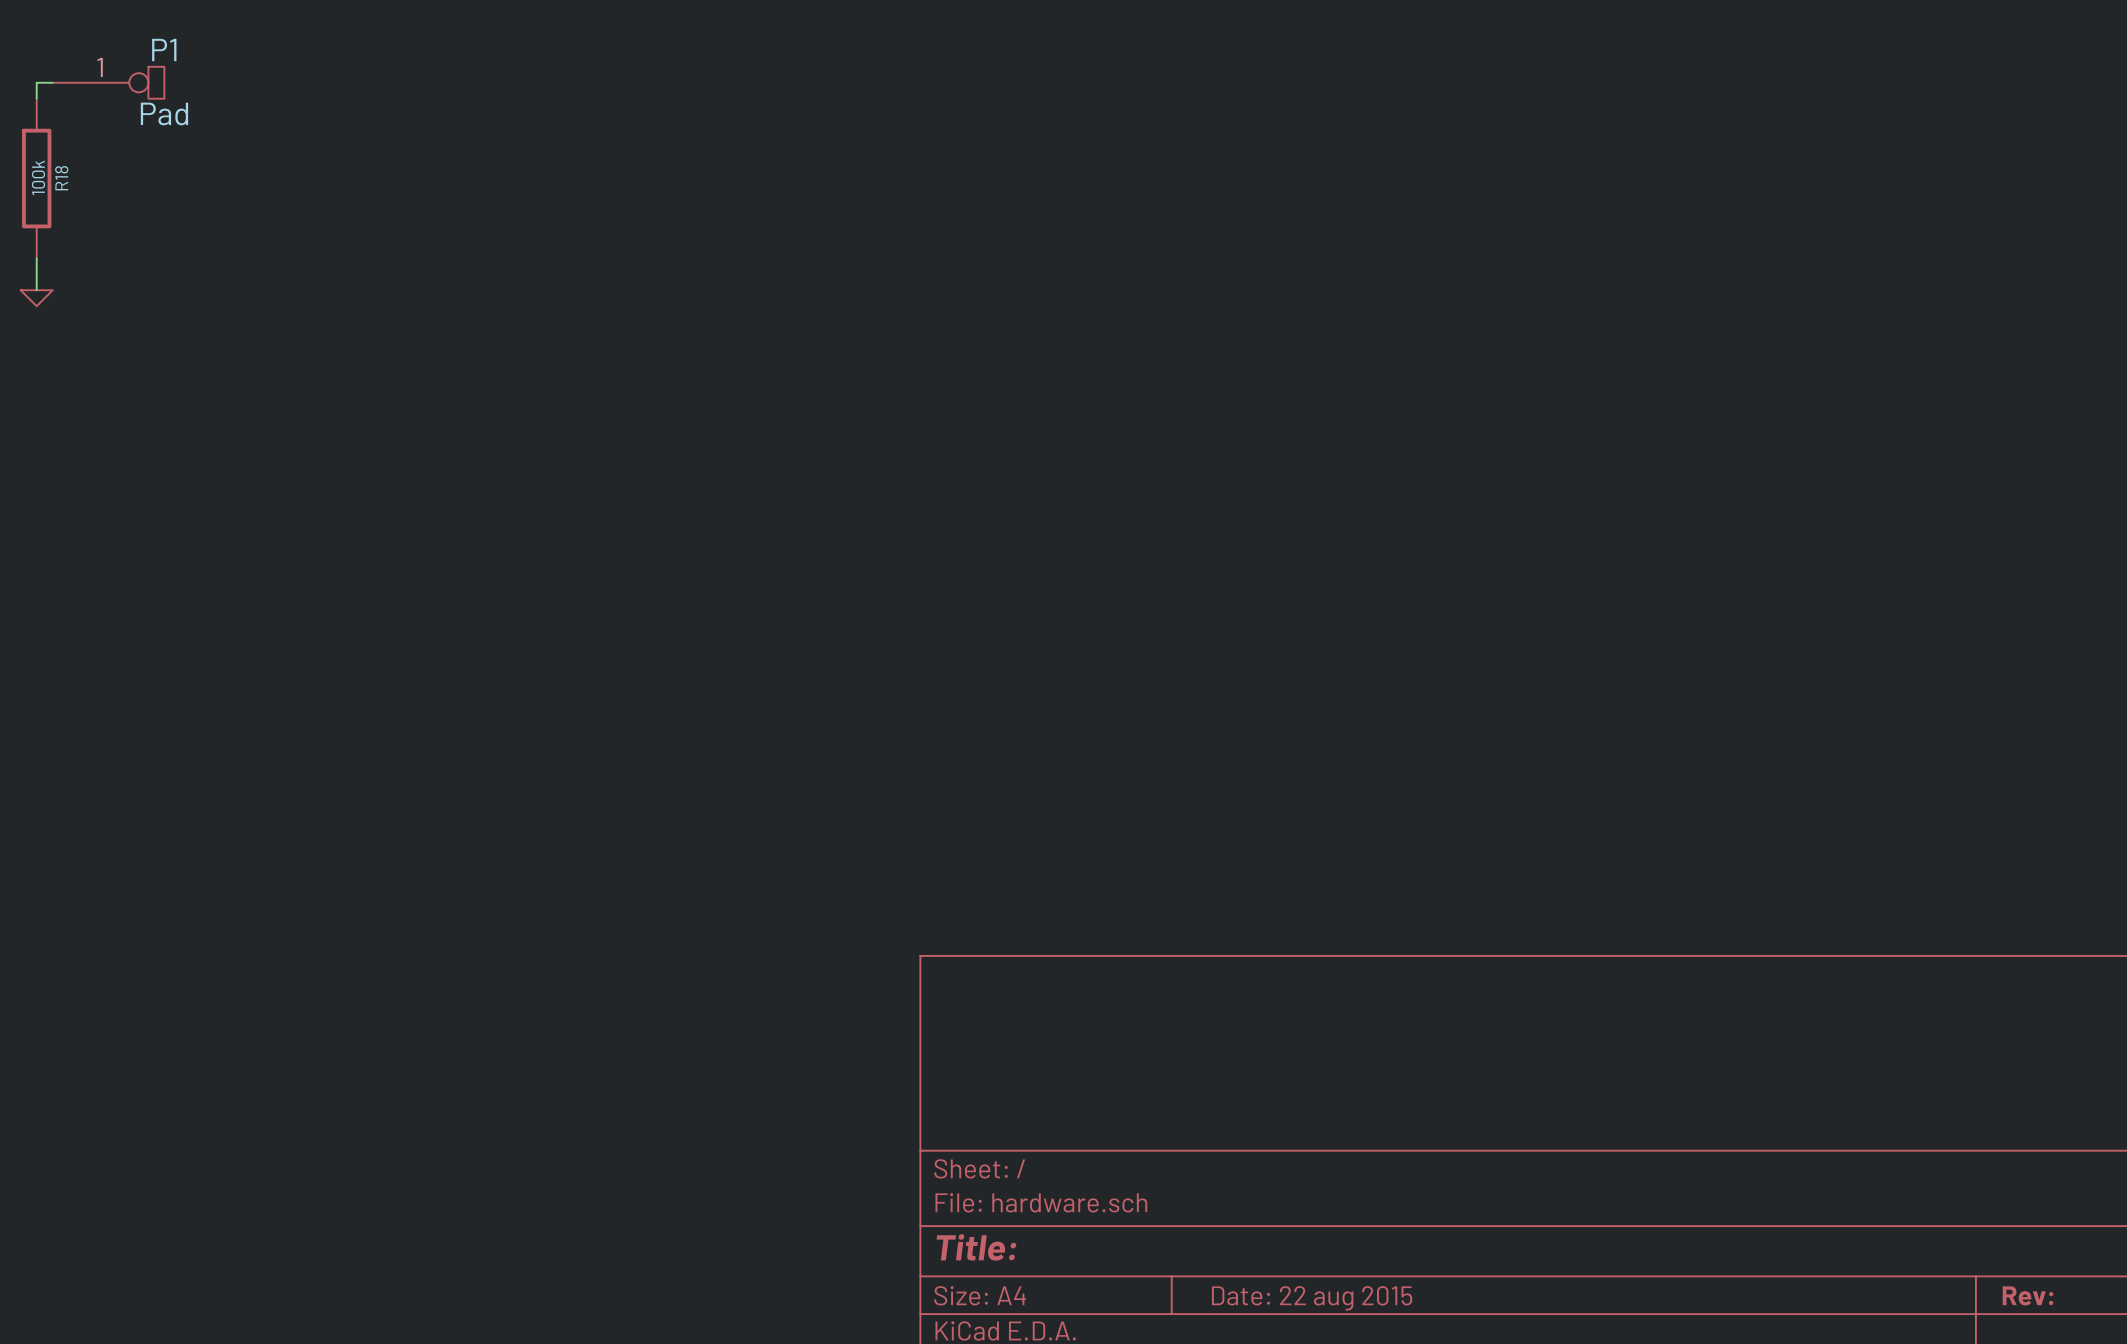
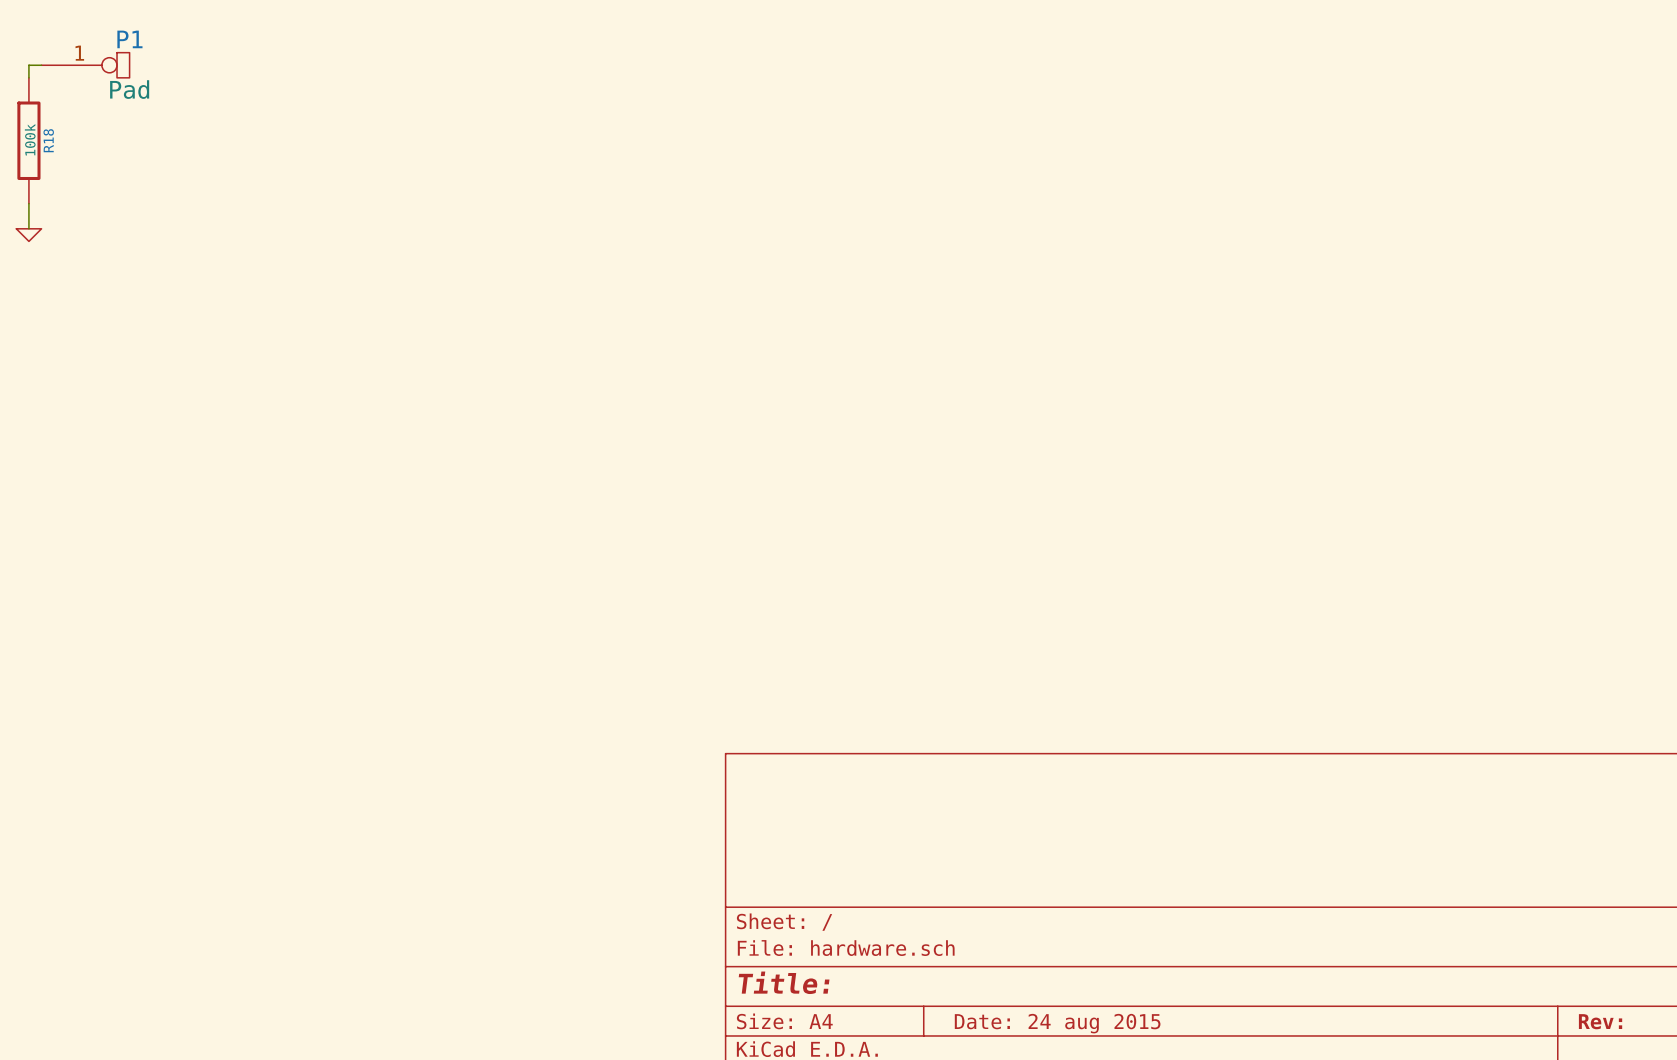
title block: Date: 22 aug 2015 (1312, 1298) -> Date: 24 aug 2015 (1057, 1023)

